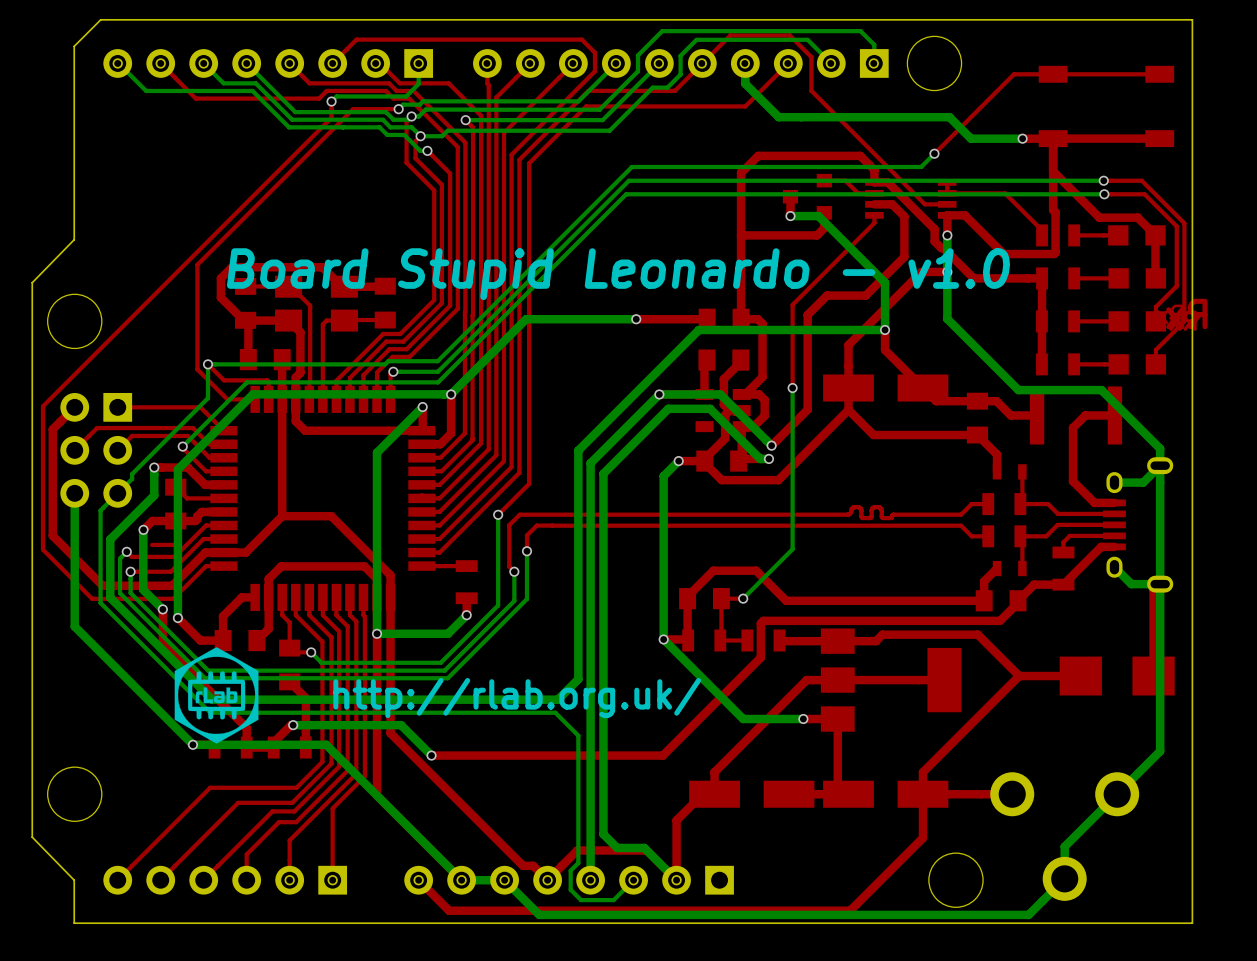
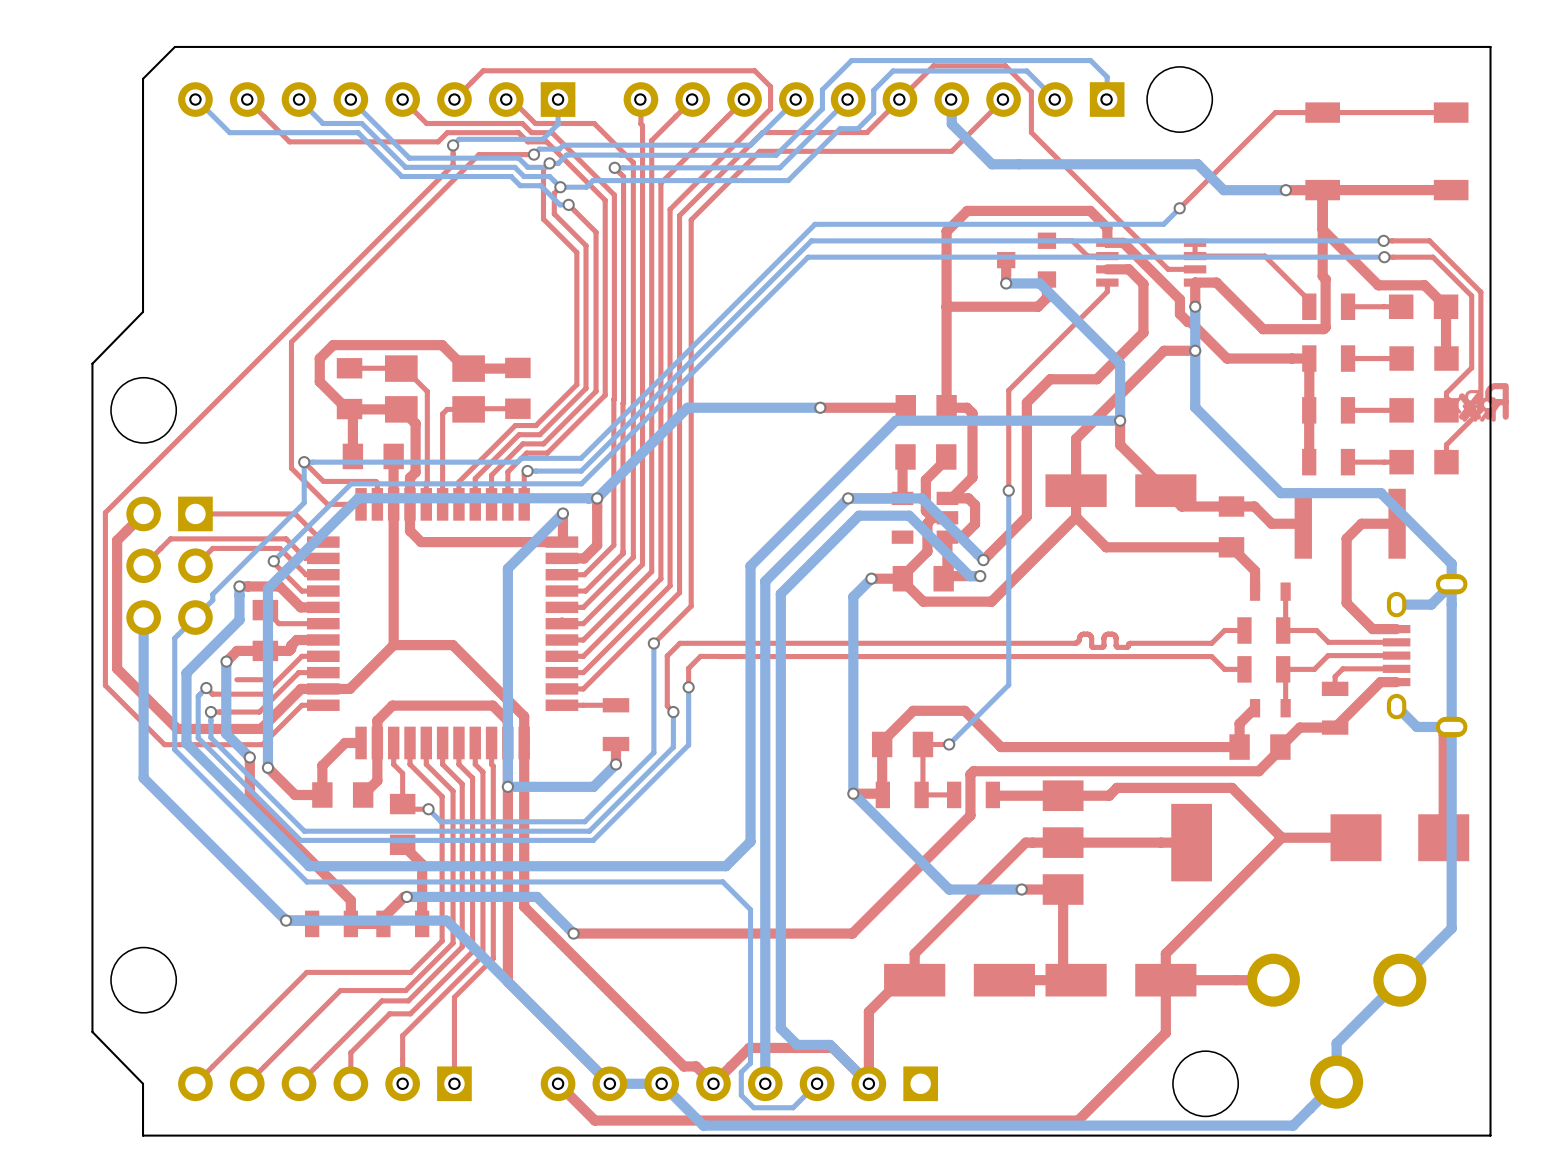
text: Board Stupid Leonardo - v1.0 (618, 274) -> none
drawing: [174, 647, 259, 744] -> none
text: http://rlab.org.uk/ (517, 698) -> none

